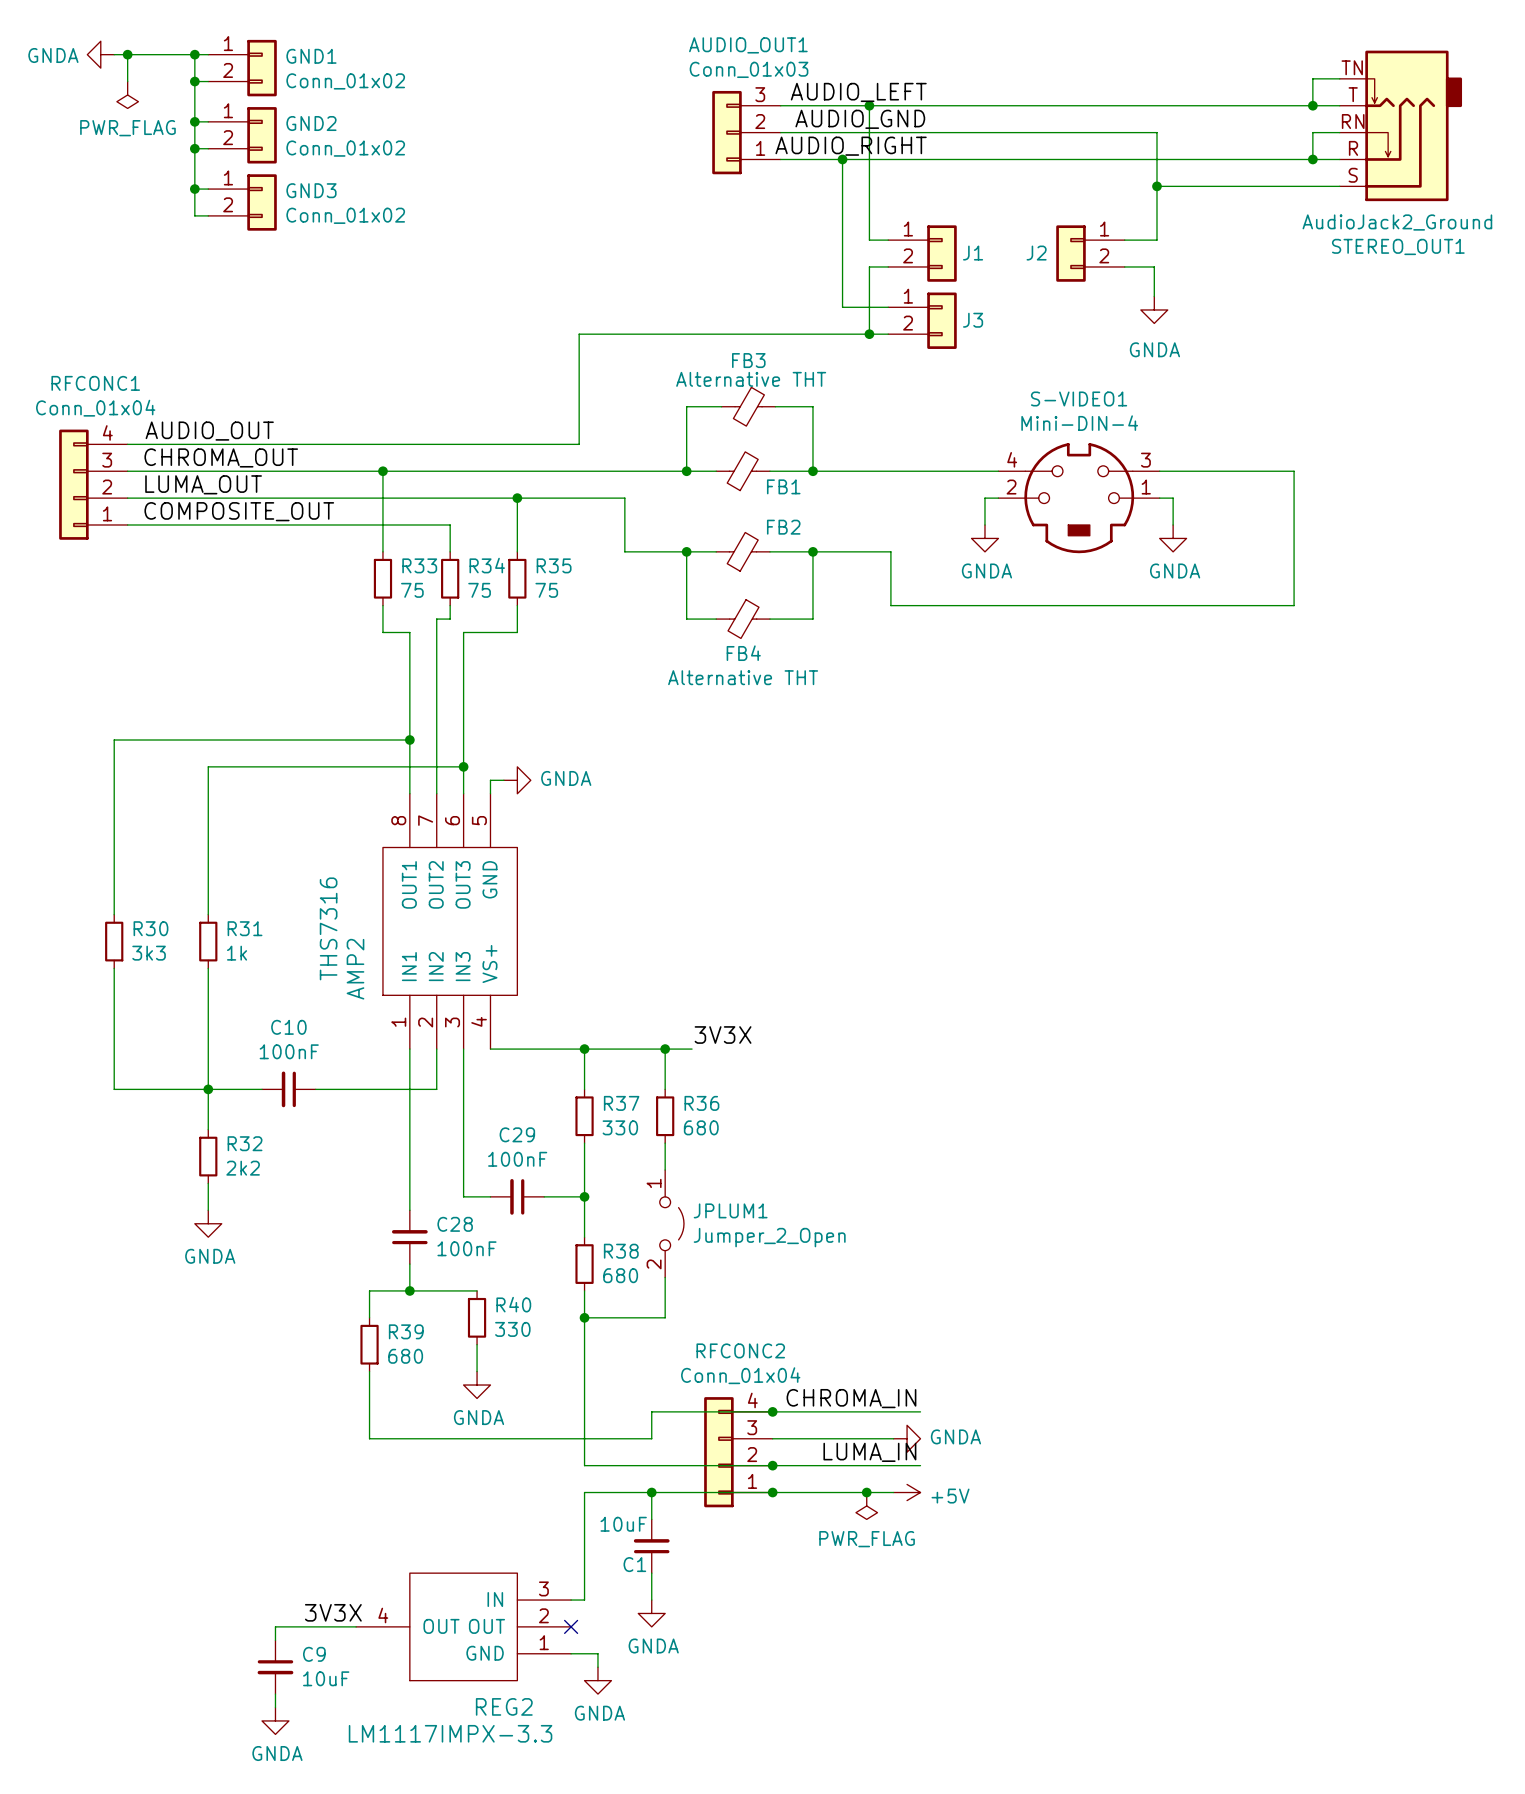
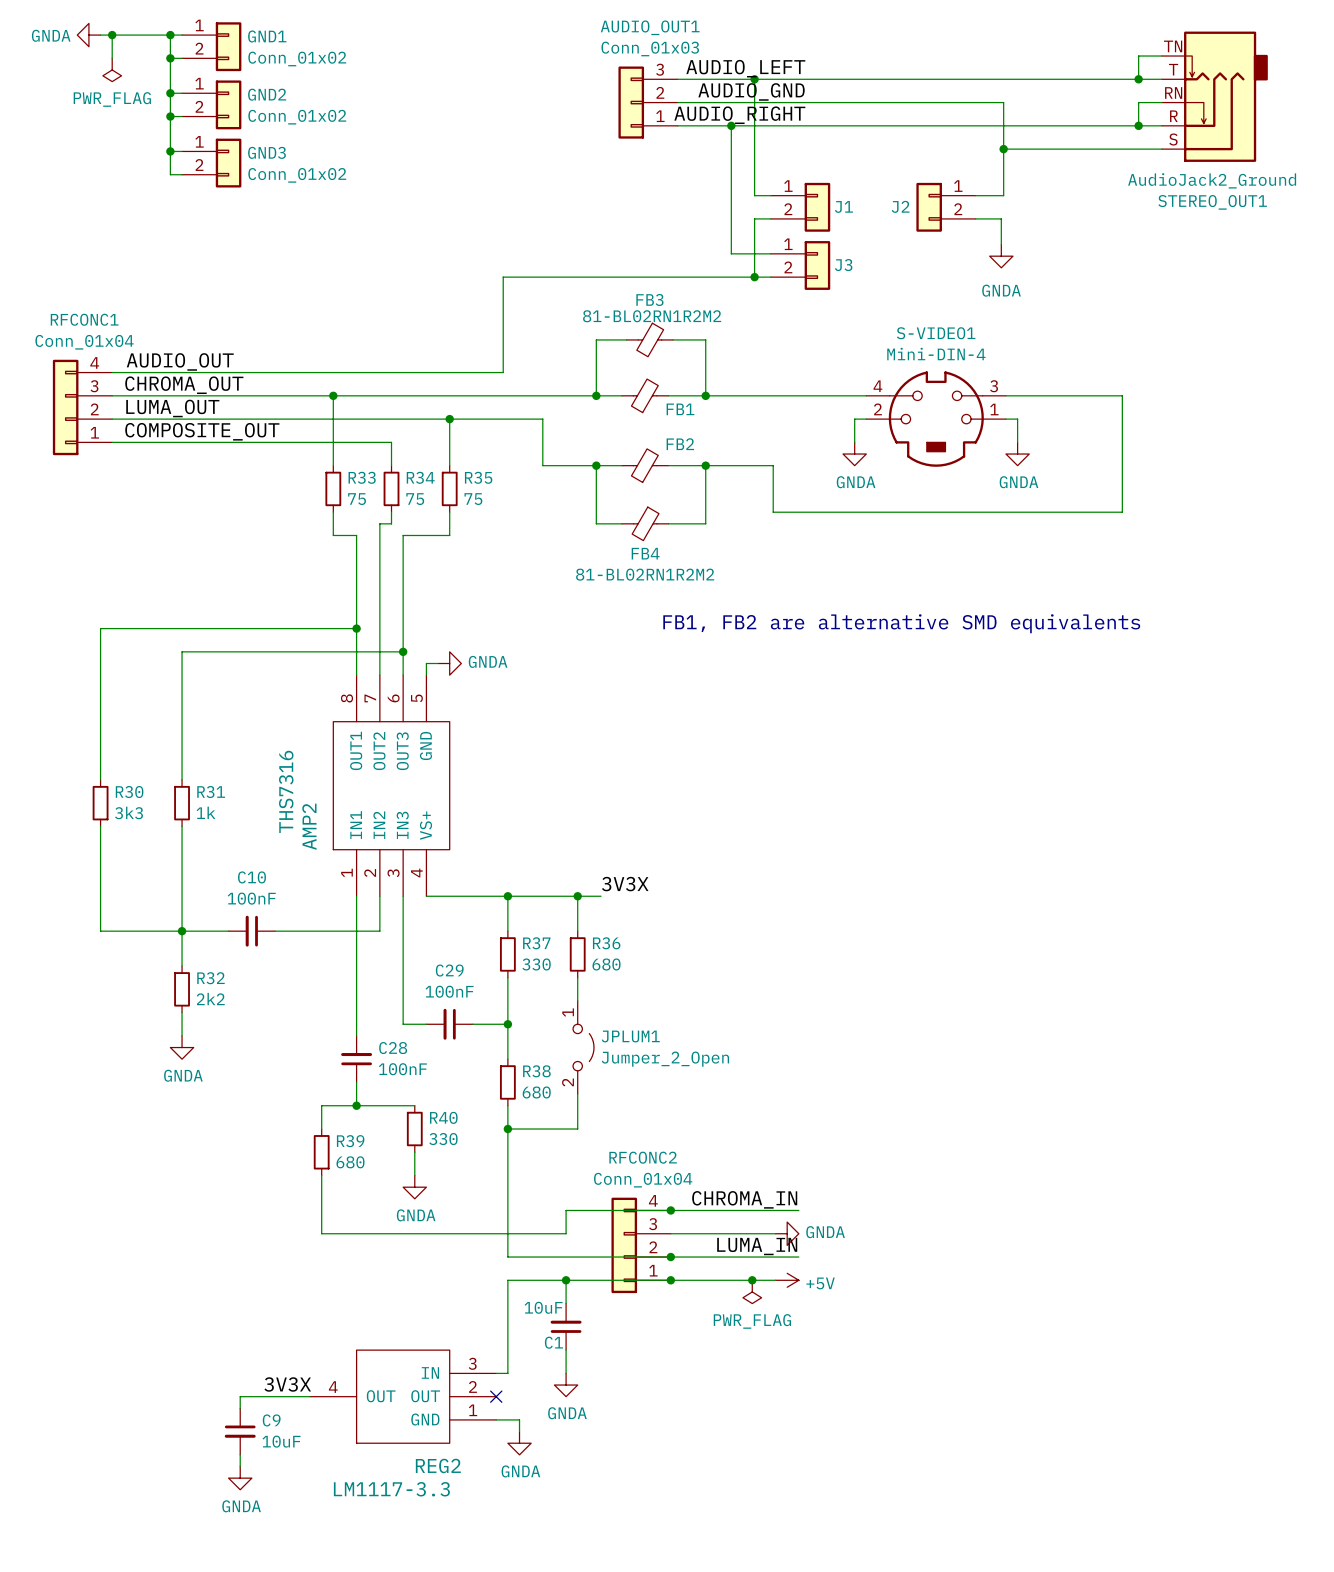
FB3 value: Alternative THT (751, 379) -> 81-BL02RN1R2M2 (652, 316)
FB4 value: Alternative THT (743, 677) -> 81-BL02RN1R2M2 (645, 574)
text: none -> FB1, FB2 are alternative SMD equivalents (901, 623)
REG2 value: LM1117IMPX-3.3 (450, 1733) -> LM1117-3.3 (391, 1489)

